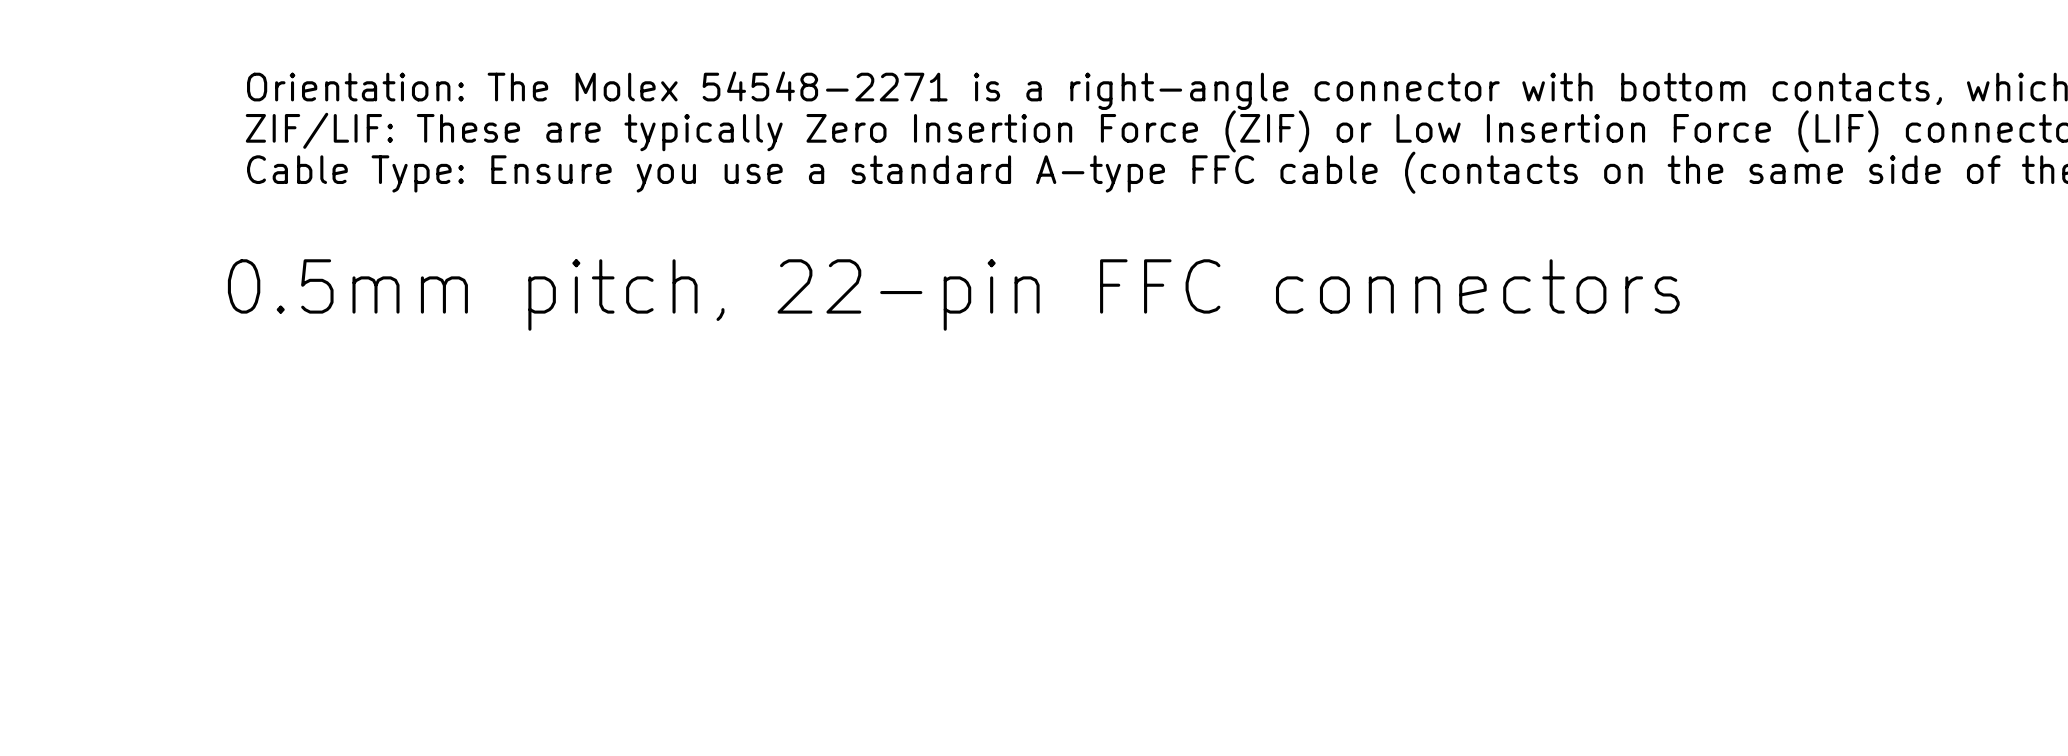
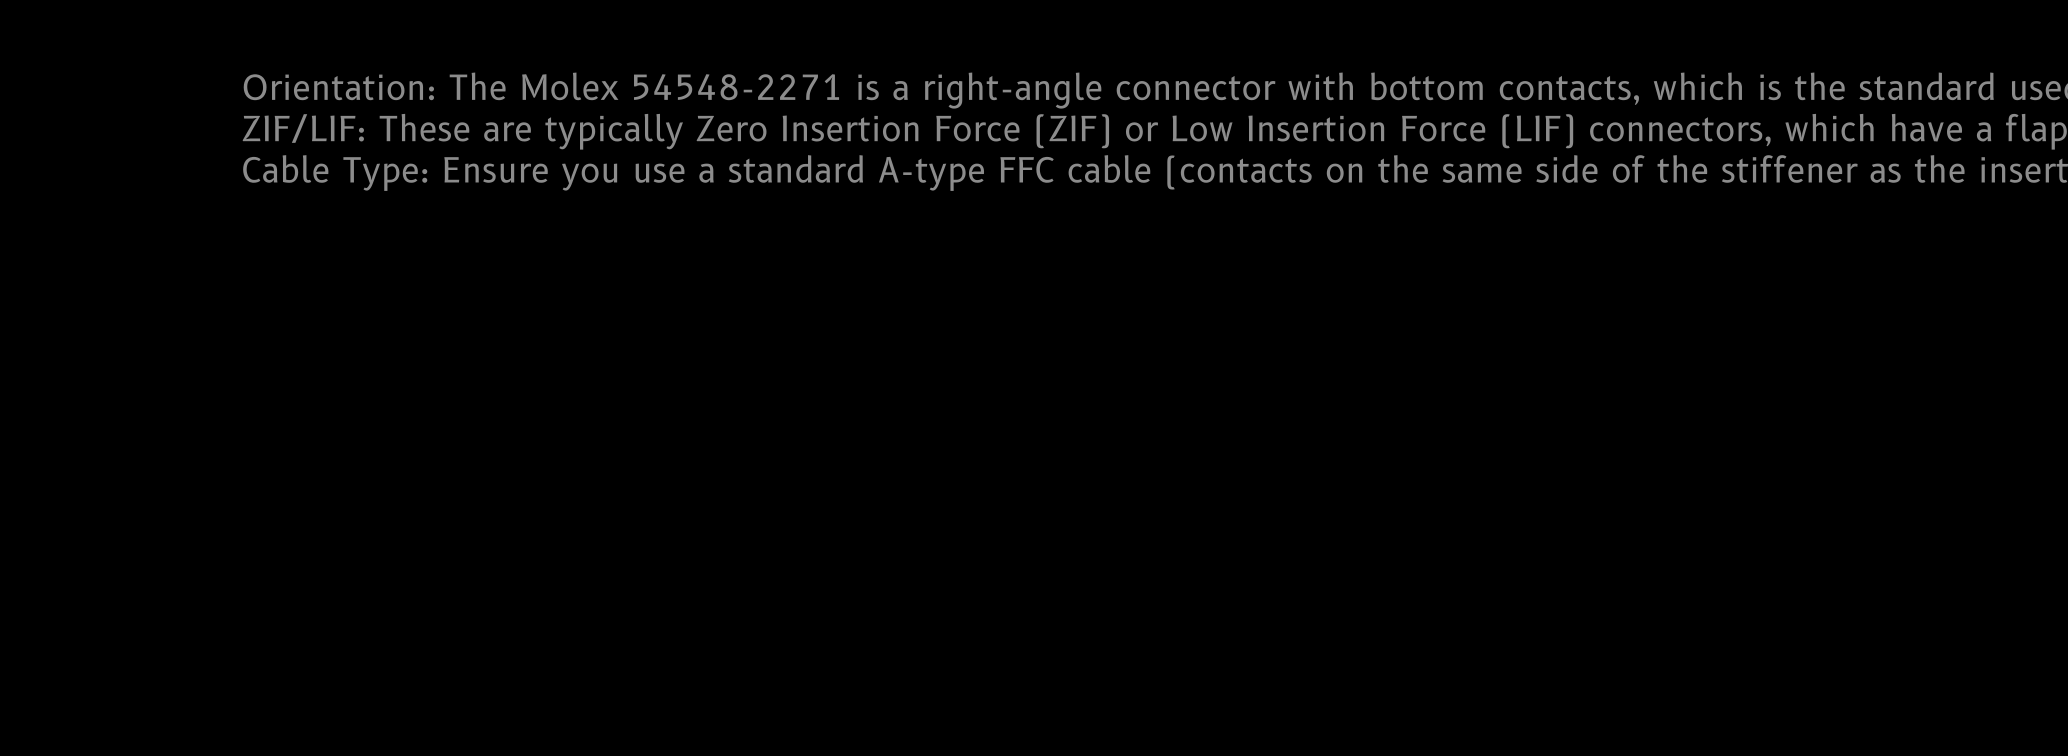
text: 0.5mm pitch, 22-pin FFC connectors (953, 294) -> none

